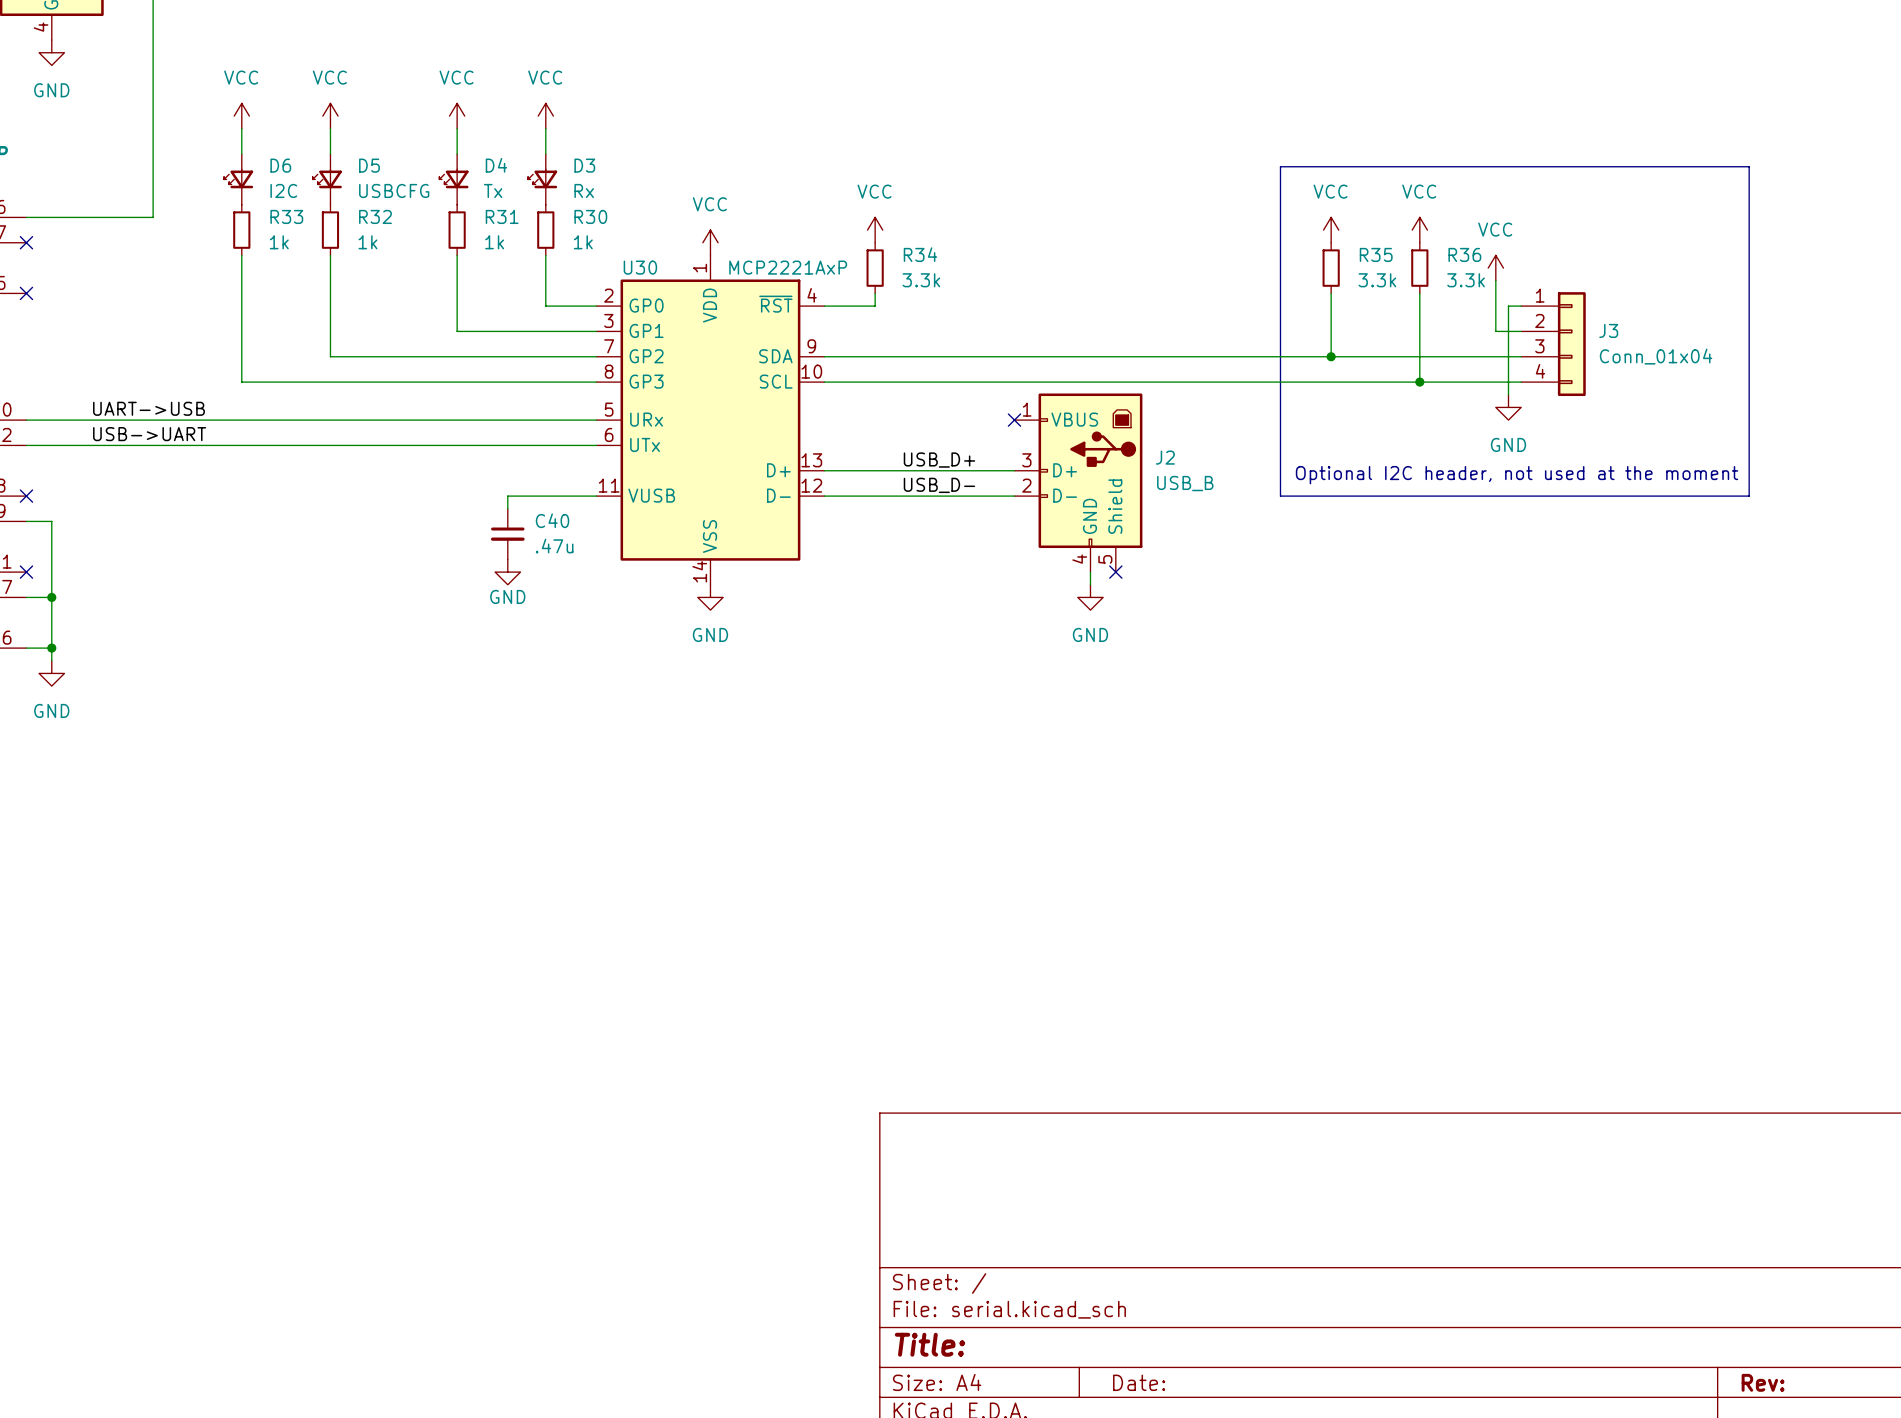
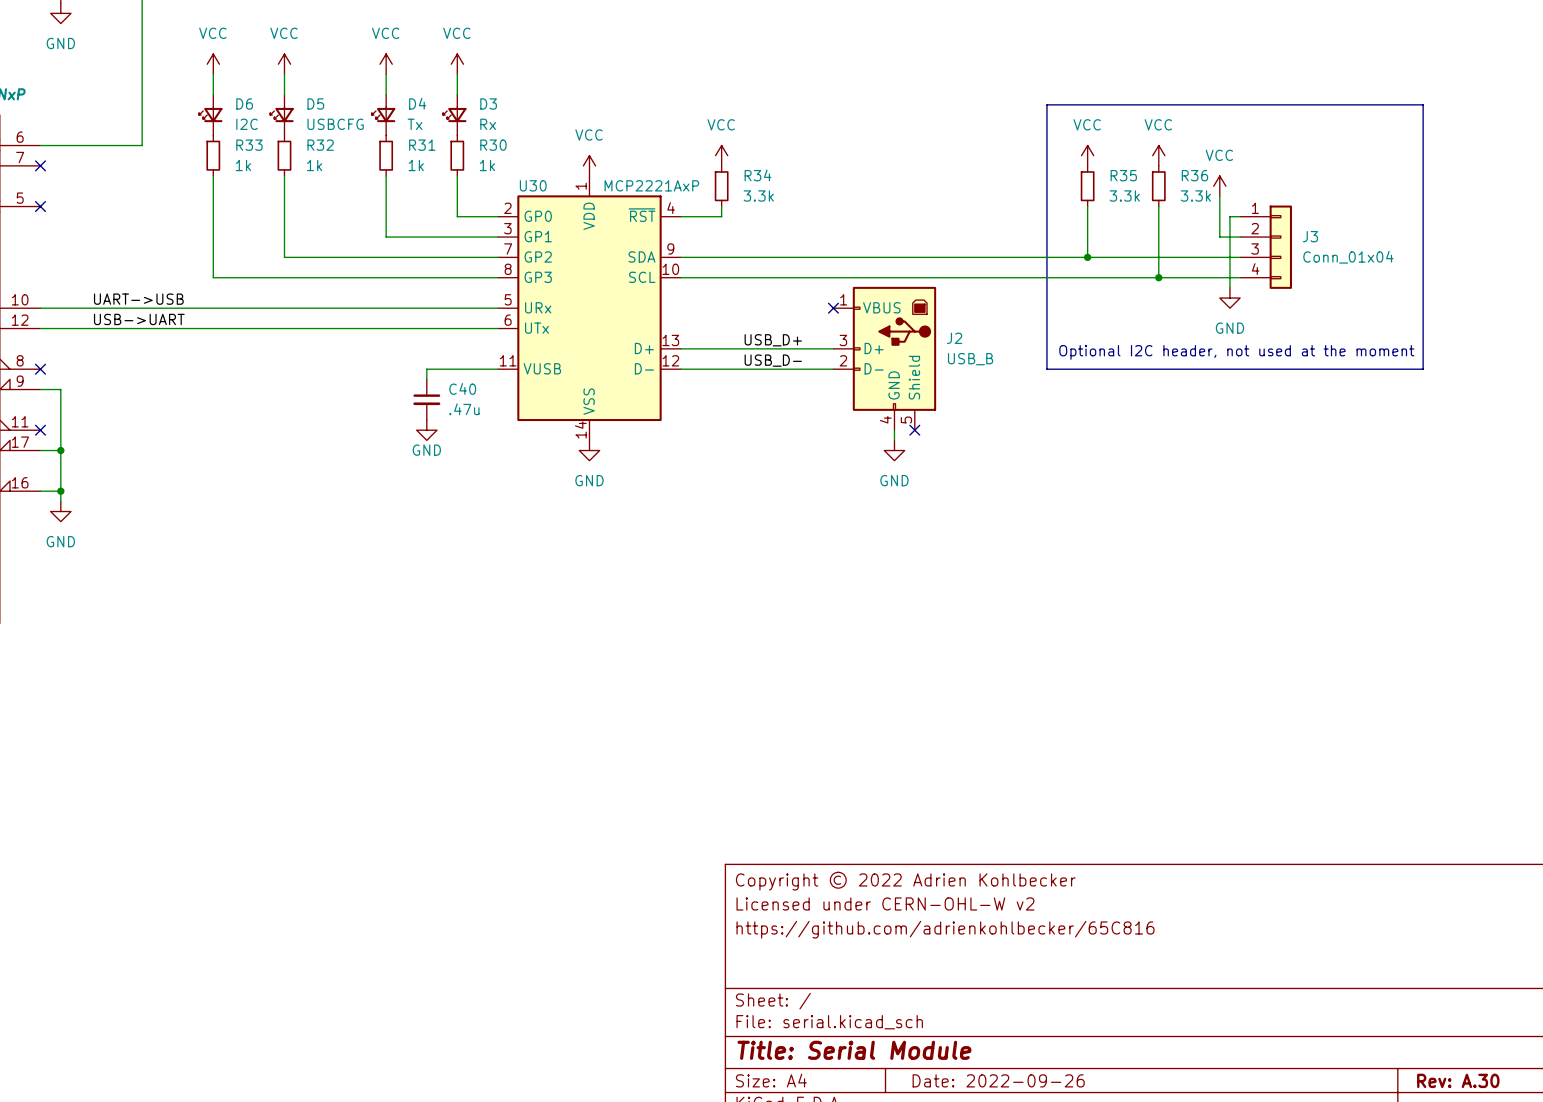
title block: none -> Copyright © 2022 Adrien Kohlbecker (905, 881)
title block: none -> Licensed under CERN-OHL-W v2 (885, 903)
title block: none -> https://github.com/adrienkohlbecker/65C816 (945, 929)
title block: Title: (930, 1344) -> Title: Serial Module (854, 1050)
title block: Date: (1139, 1382) -> Date: 2022-09-26 (998, 1080)
title block: Rev: (1763, 1382) -> Rev: A.30 (1458, 1080)

